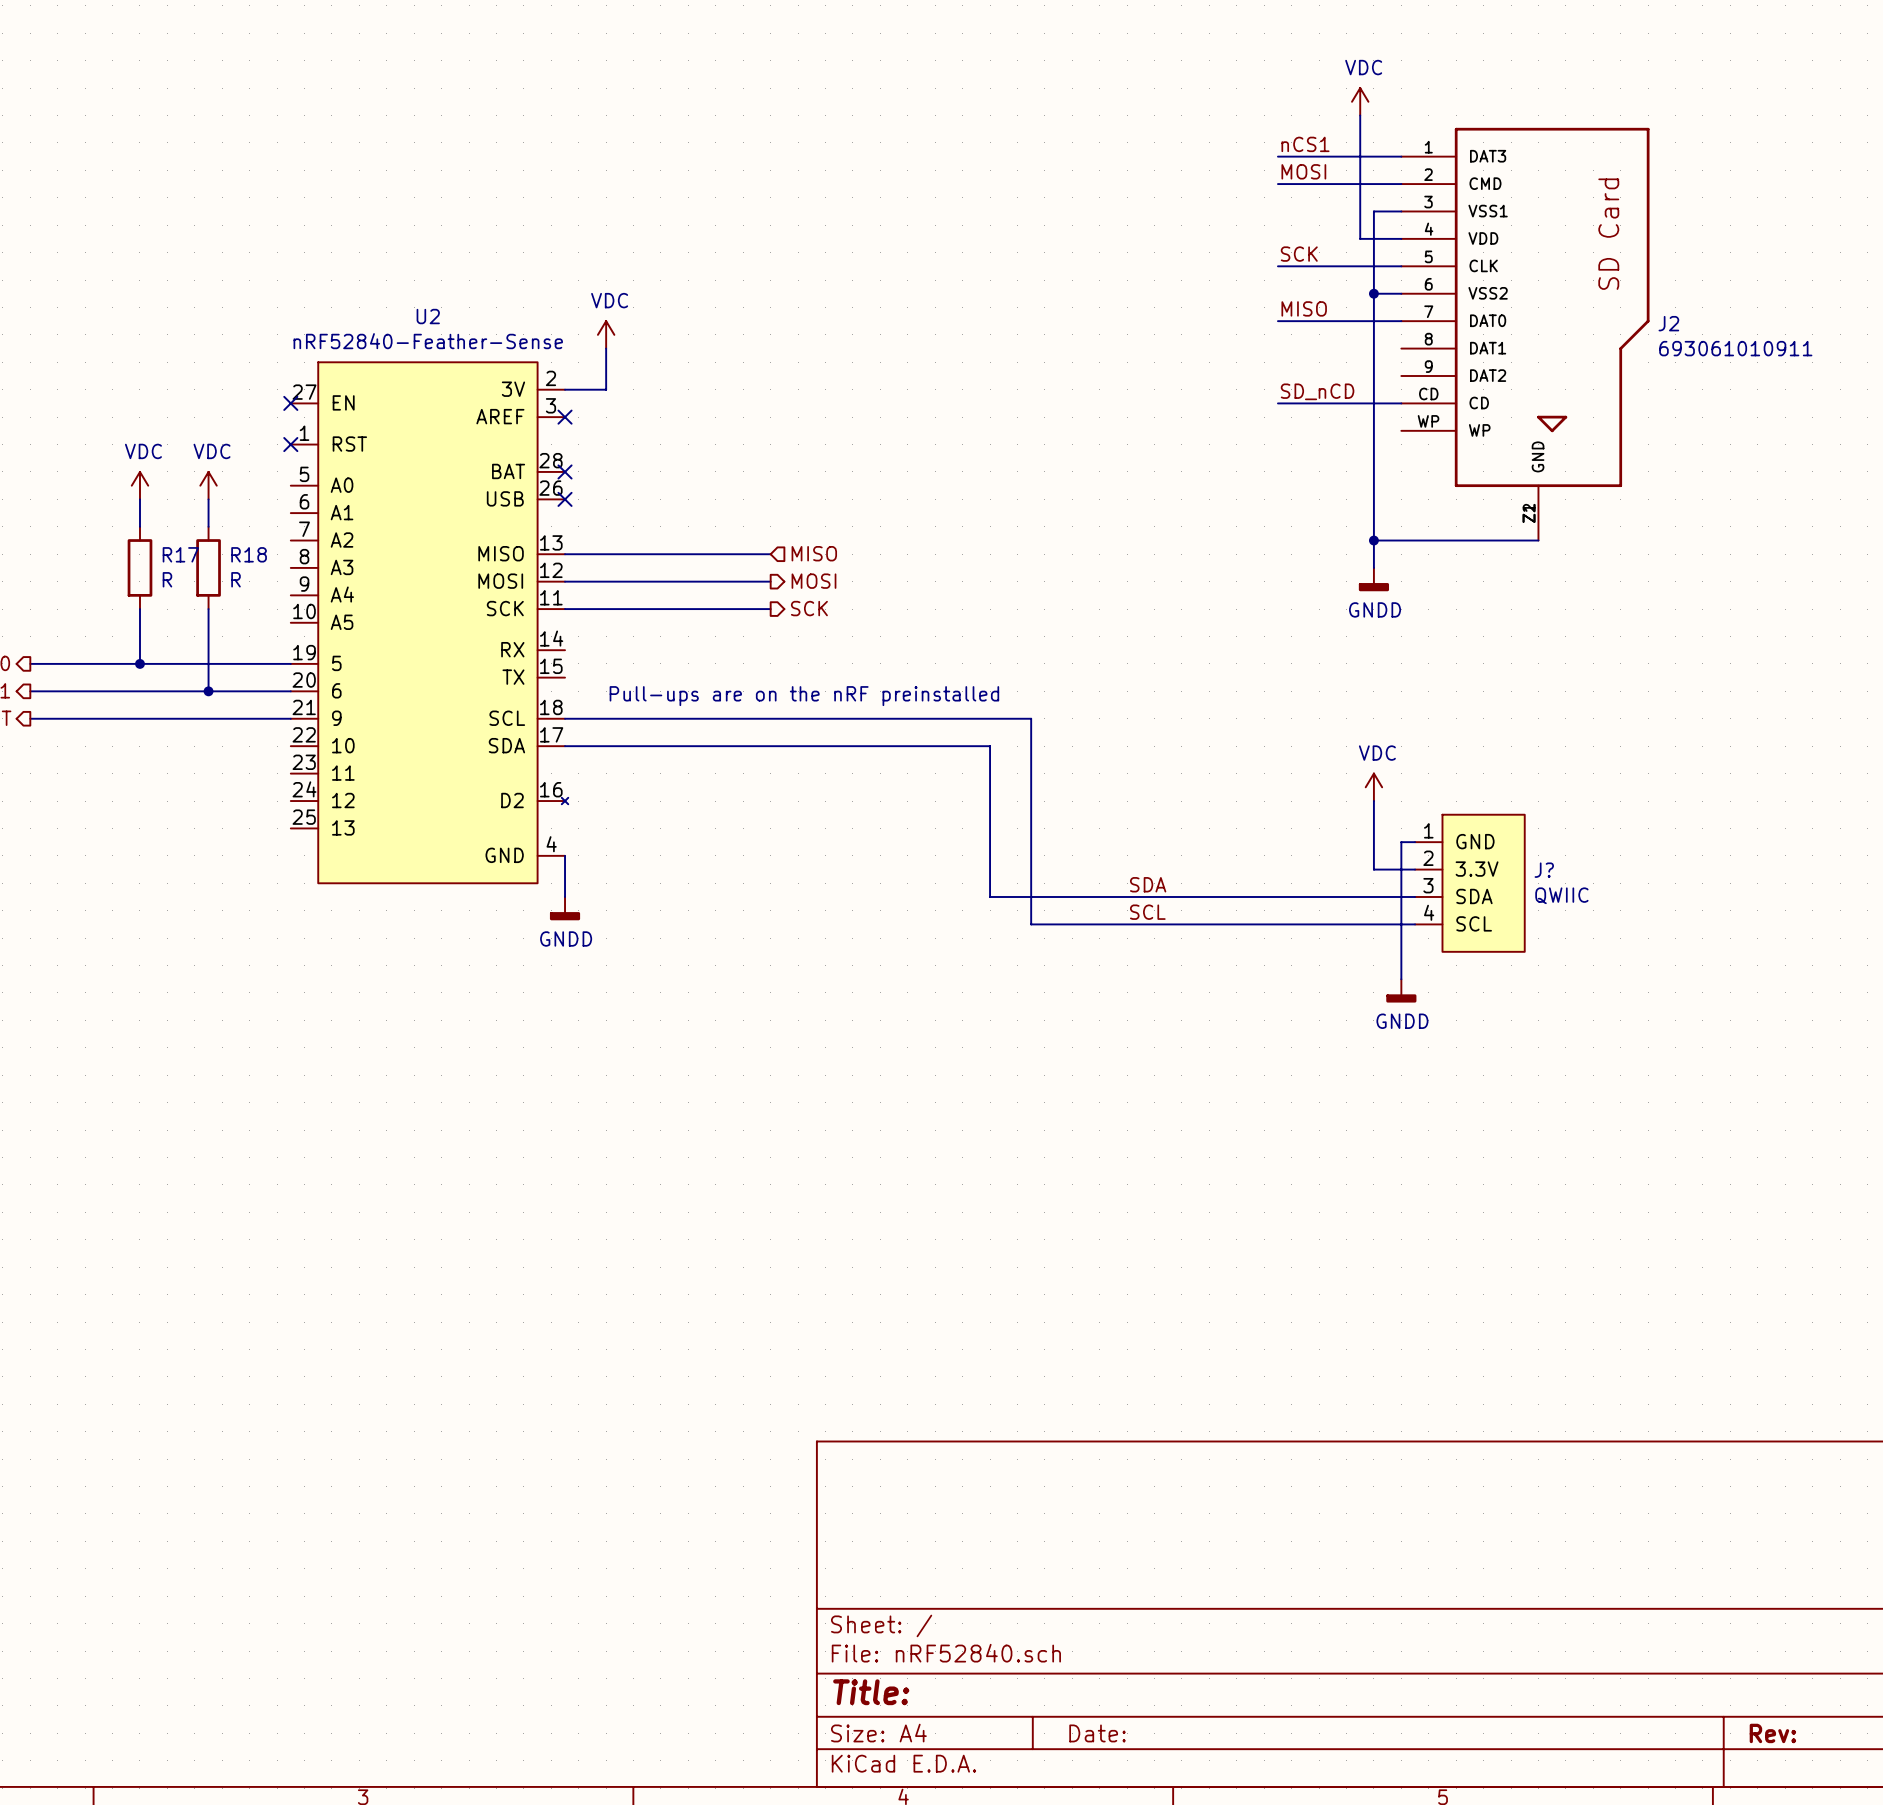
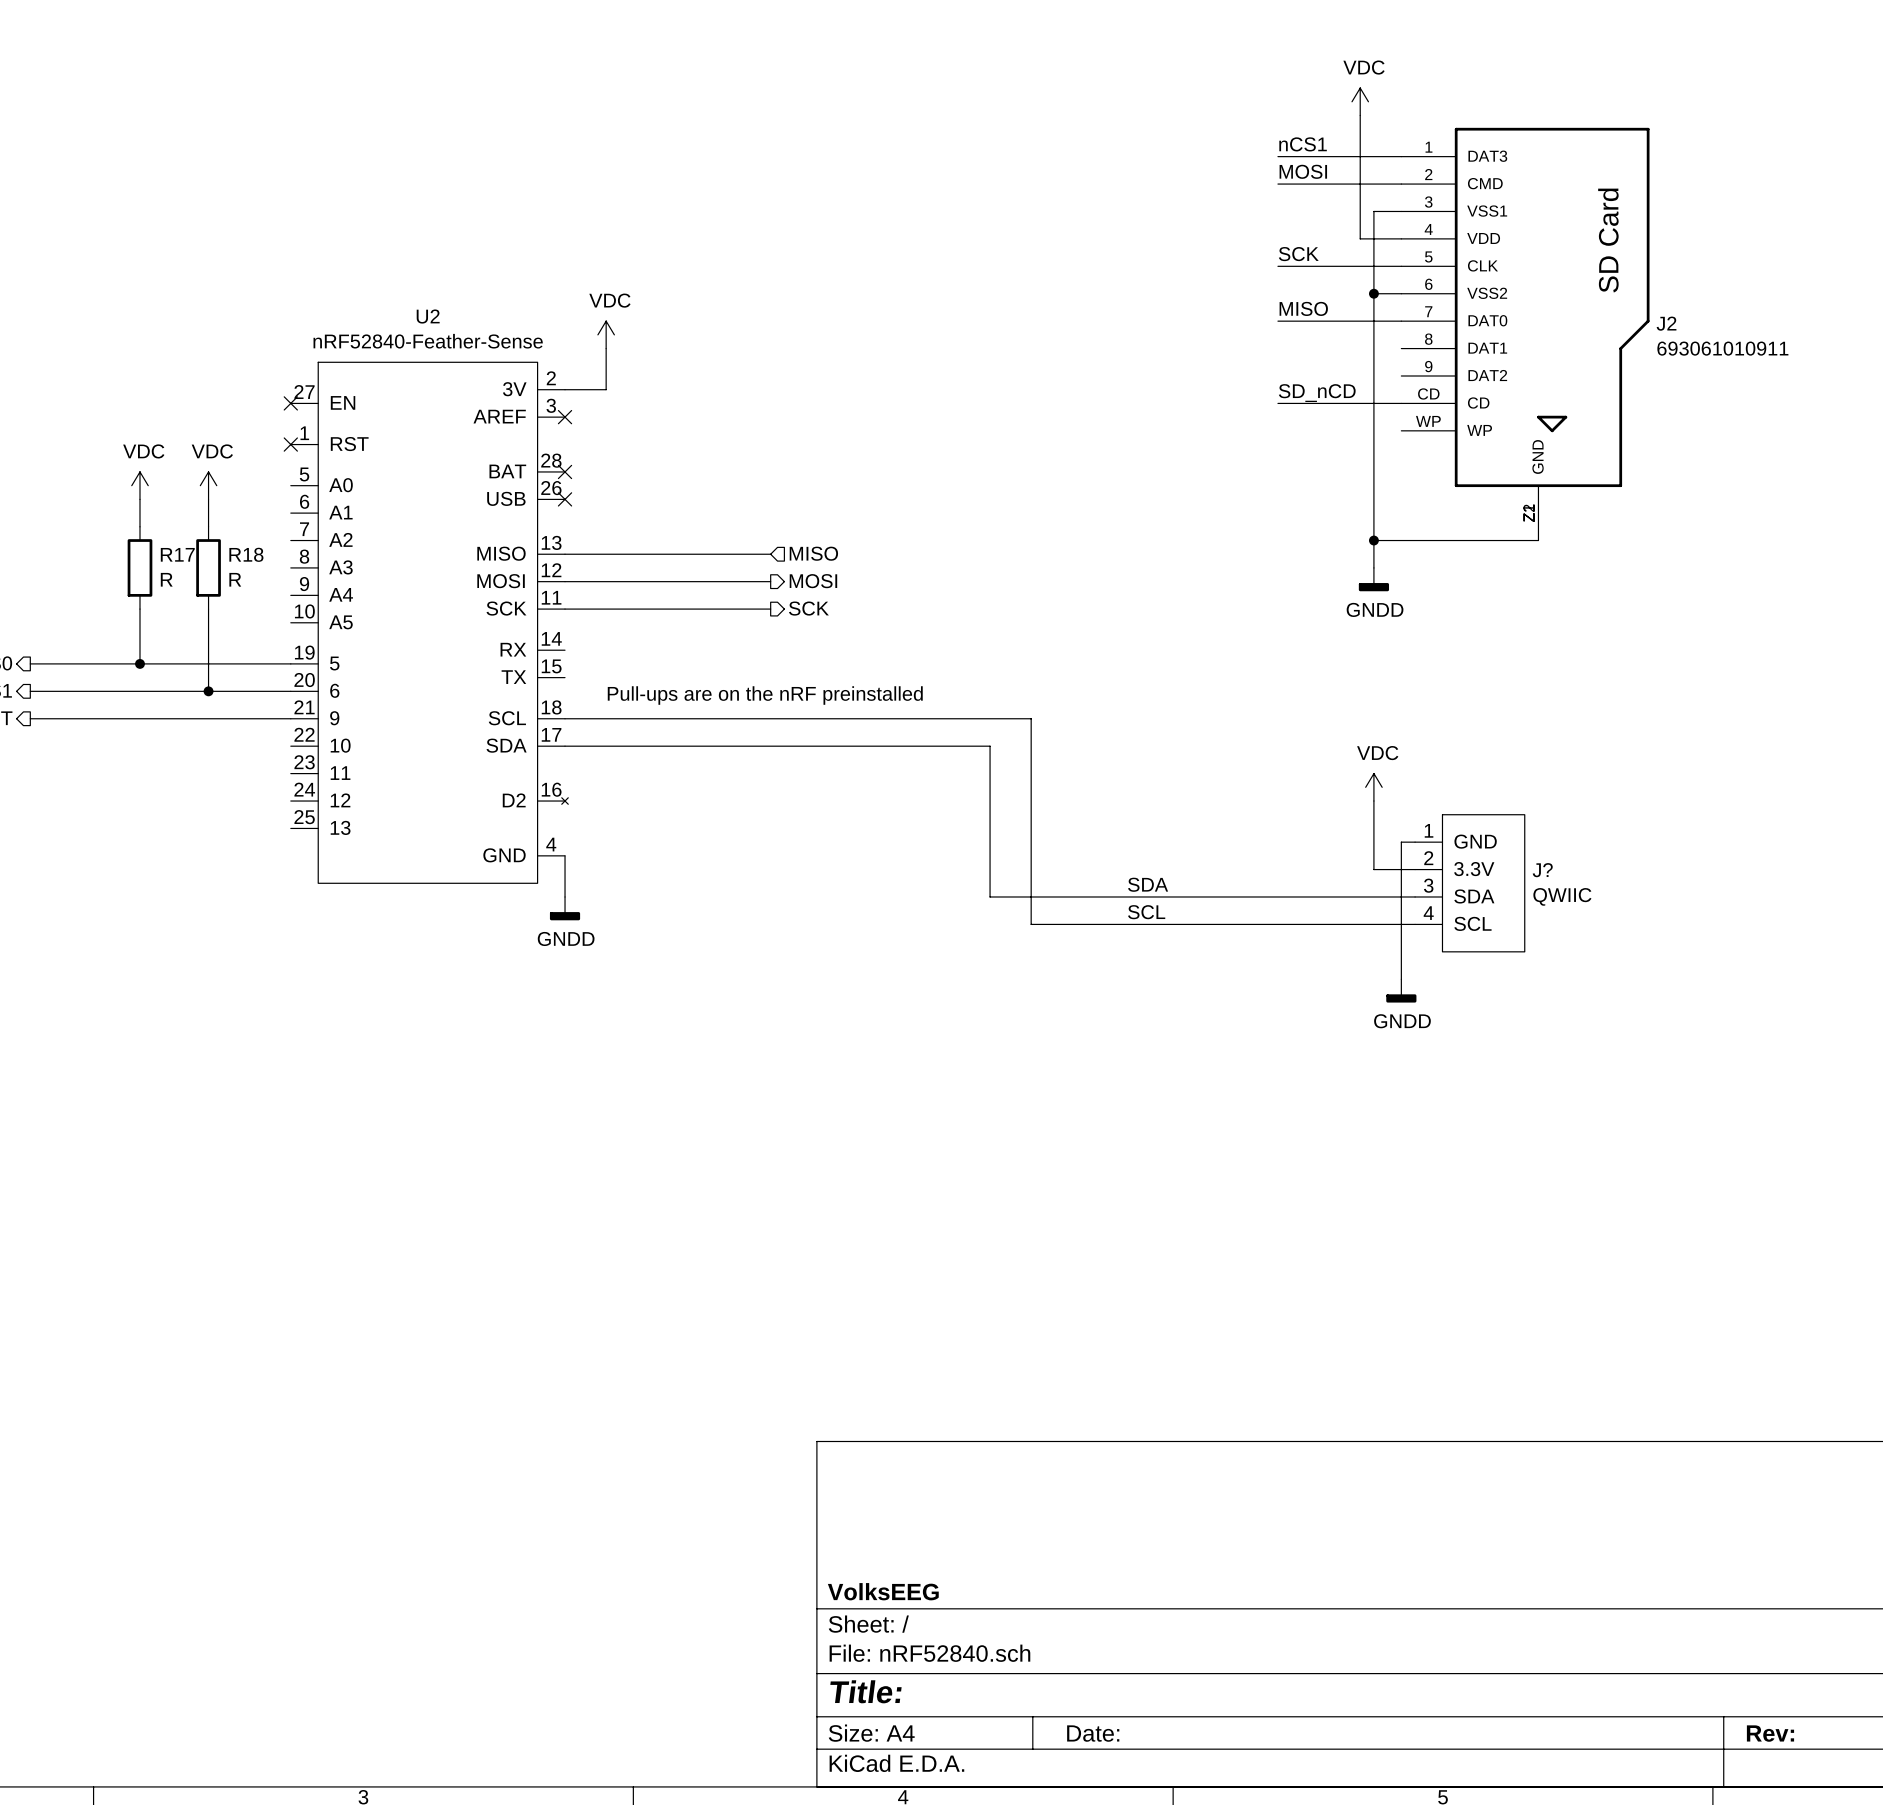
title block: none -> VolksEEG (883, 1591)

